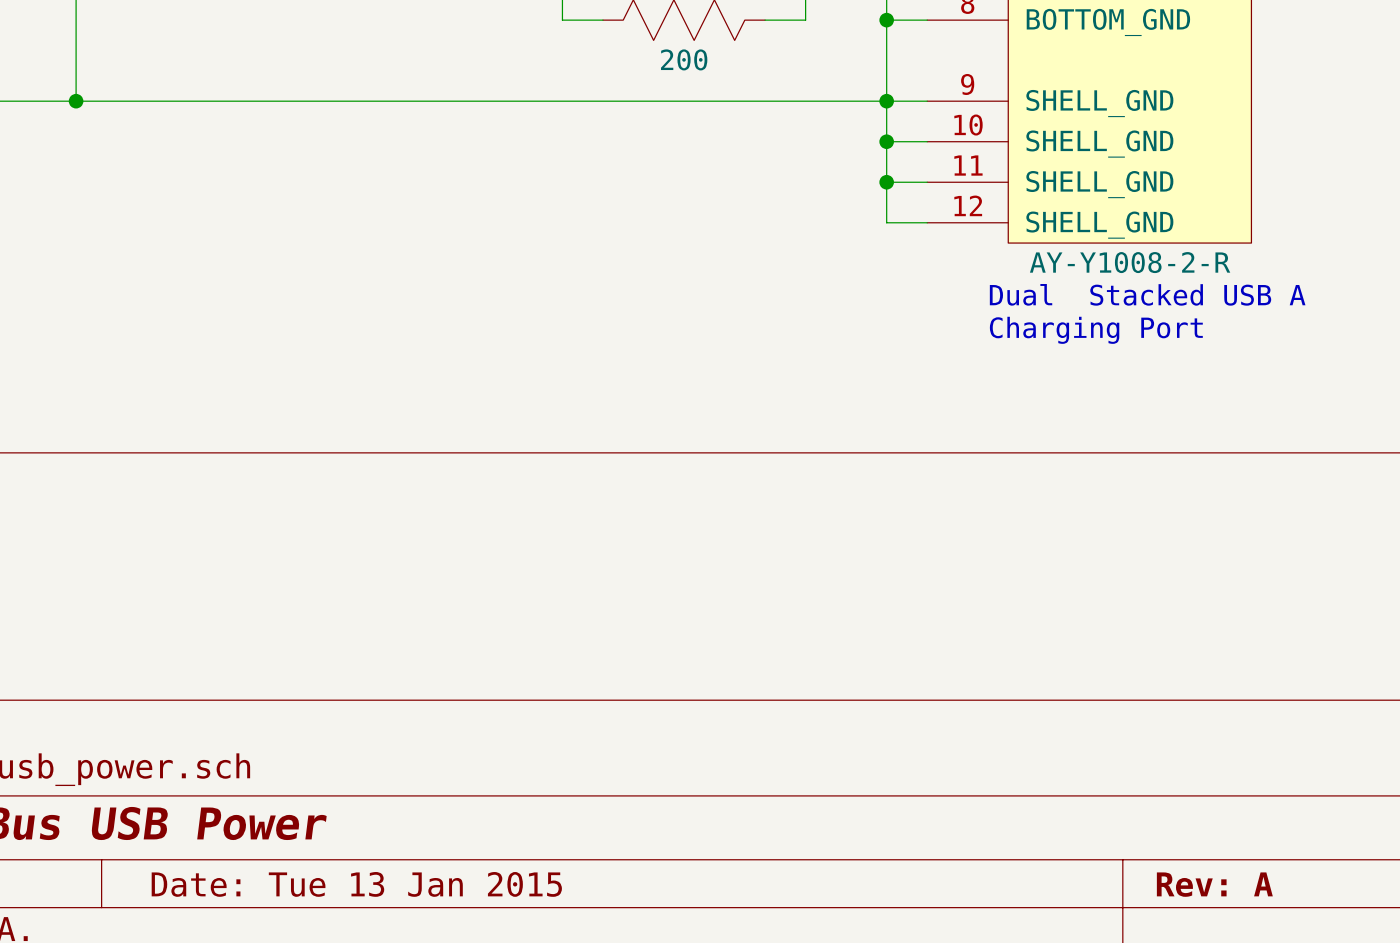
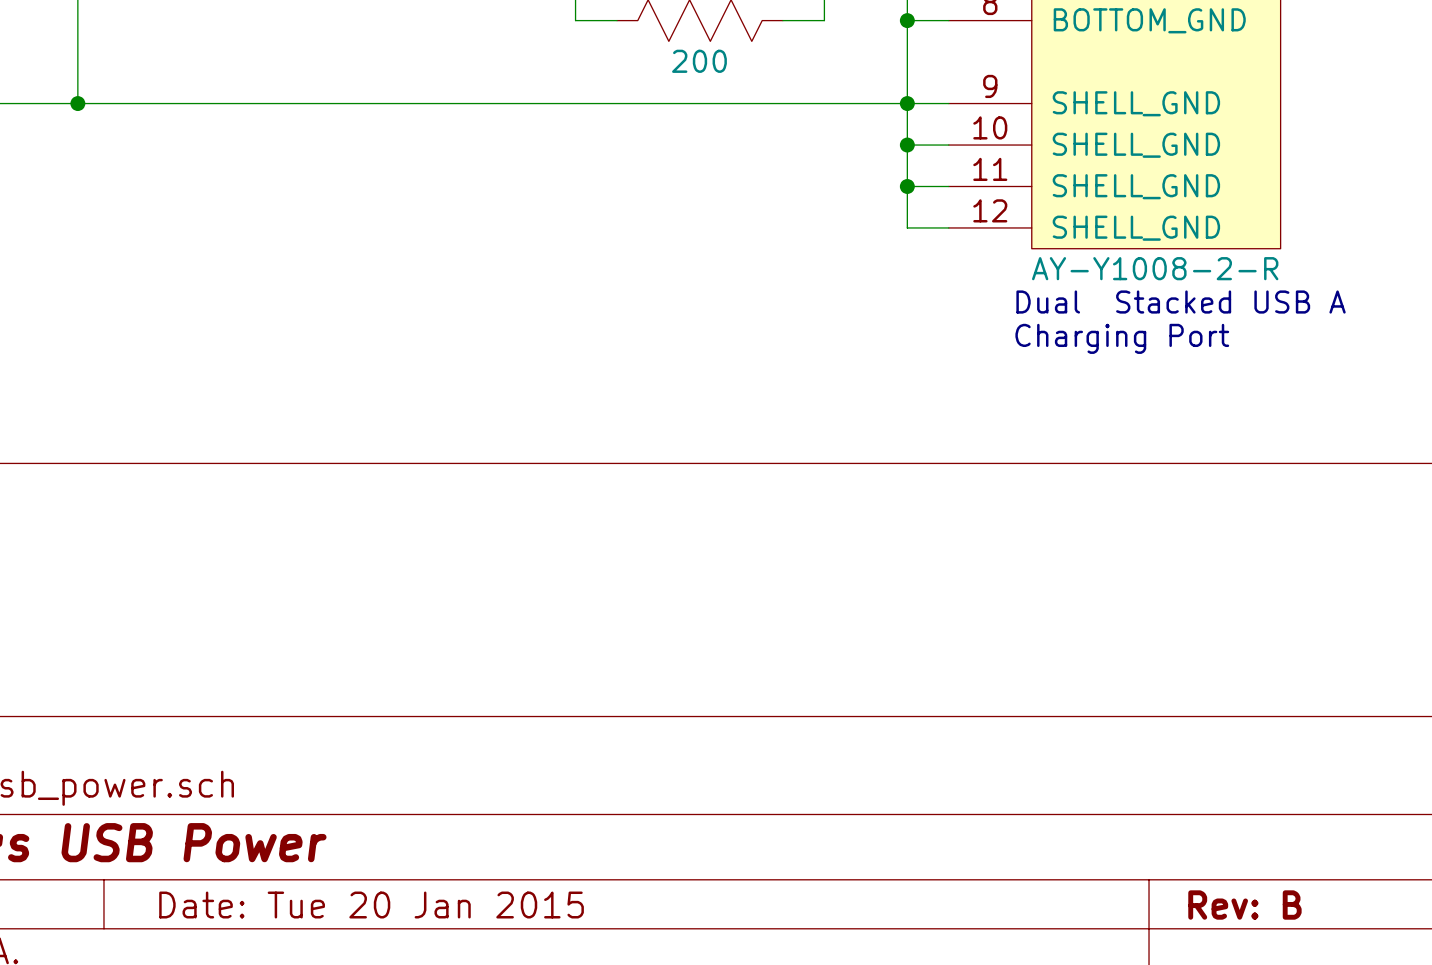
title block: Date: Tue 13 Jan 2015 (356, 884) -> Date: Tue 20 Jan 2015 (371, 905)
title block: Rev: A (1214, 884) -> Rev: B (1244, 905)

